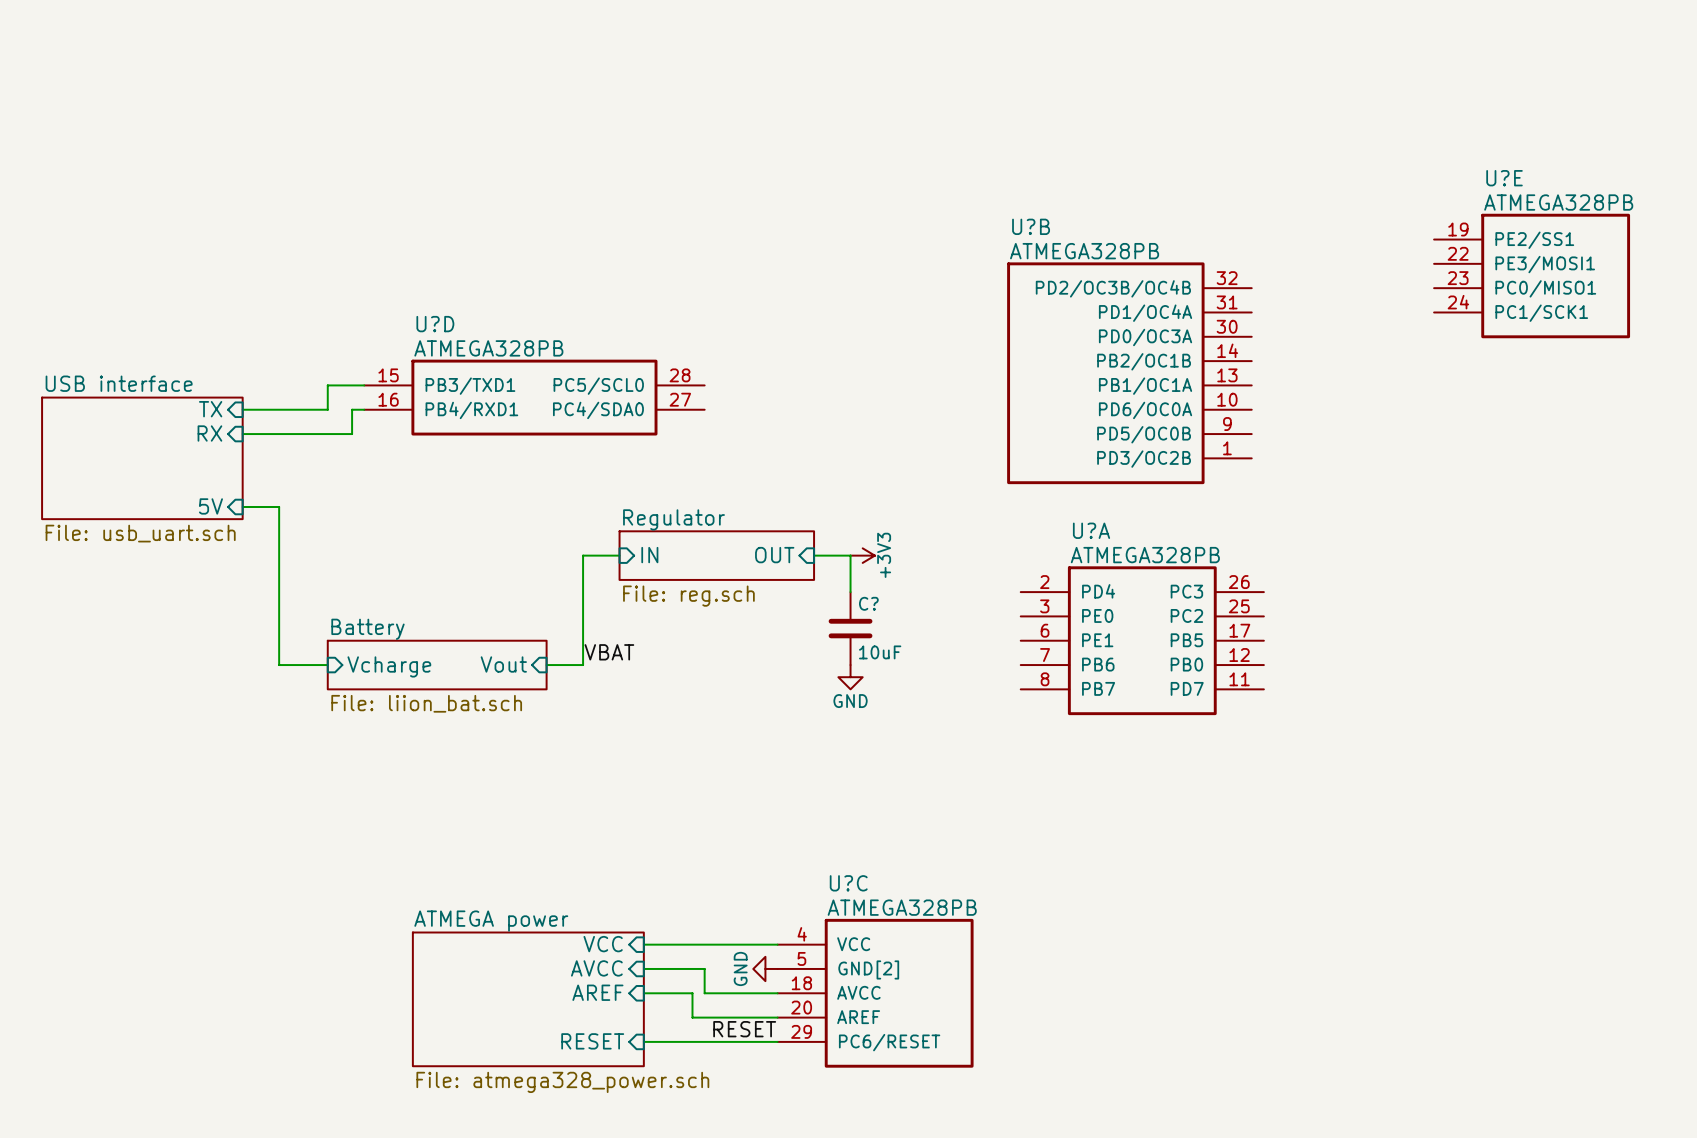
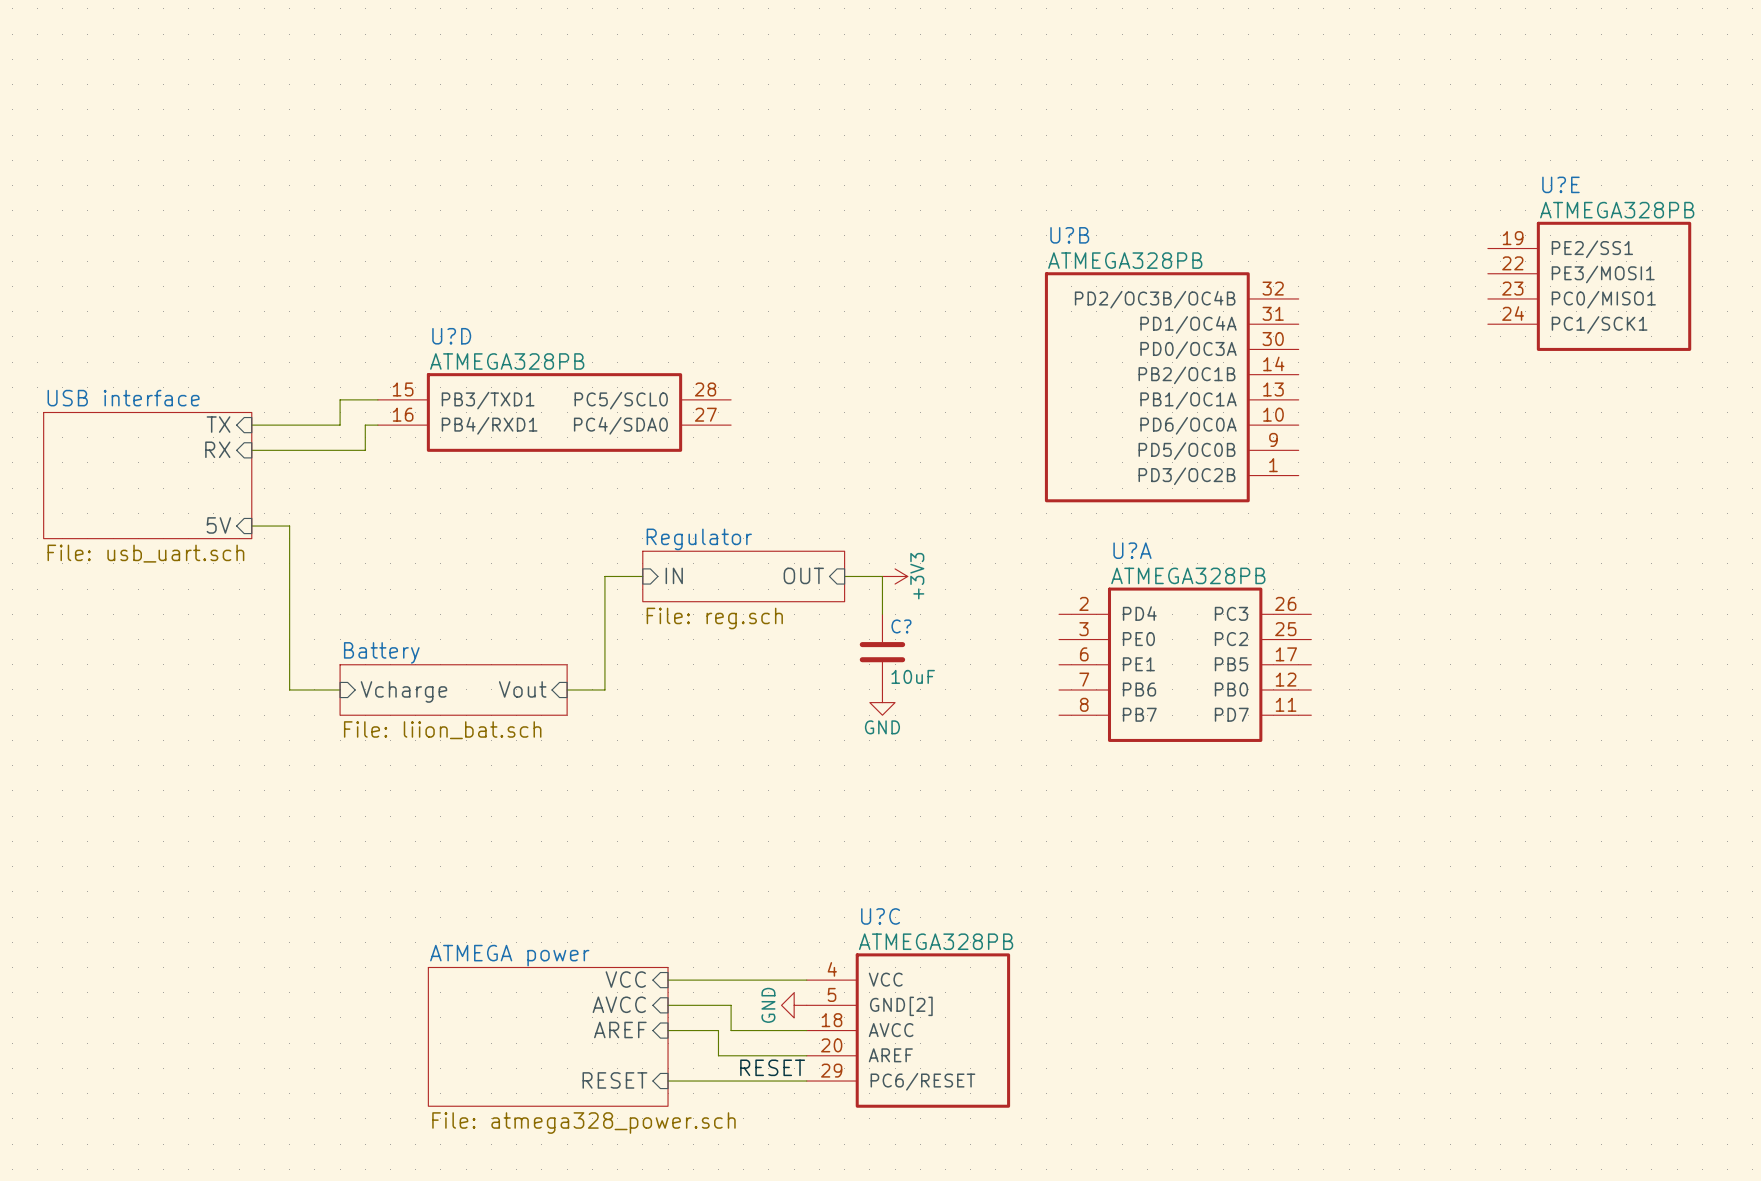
label: VBAT (609, 652) -> none

